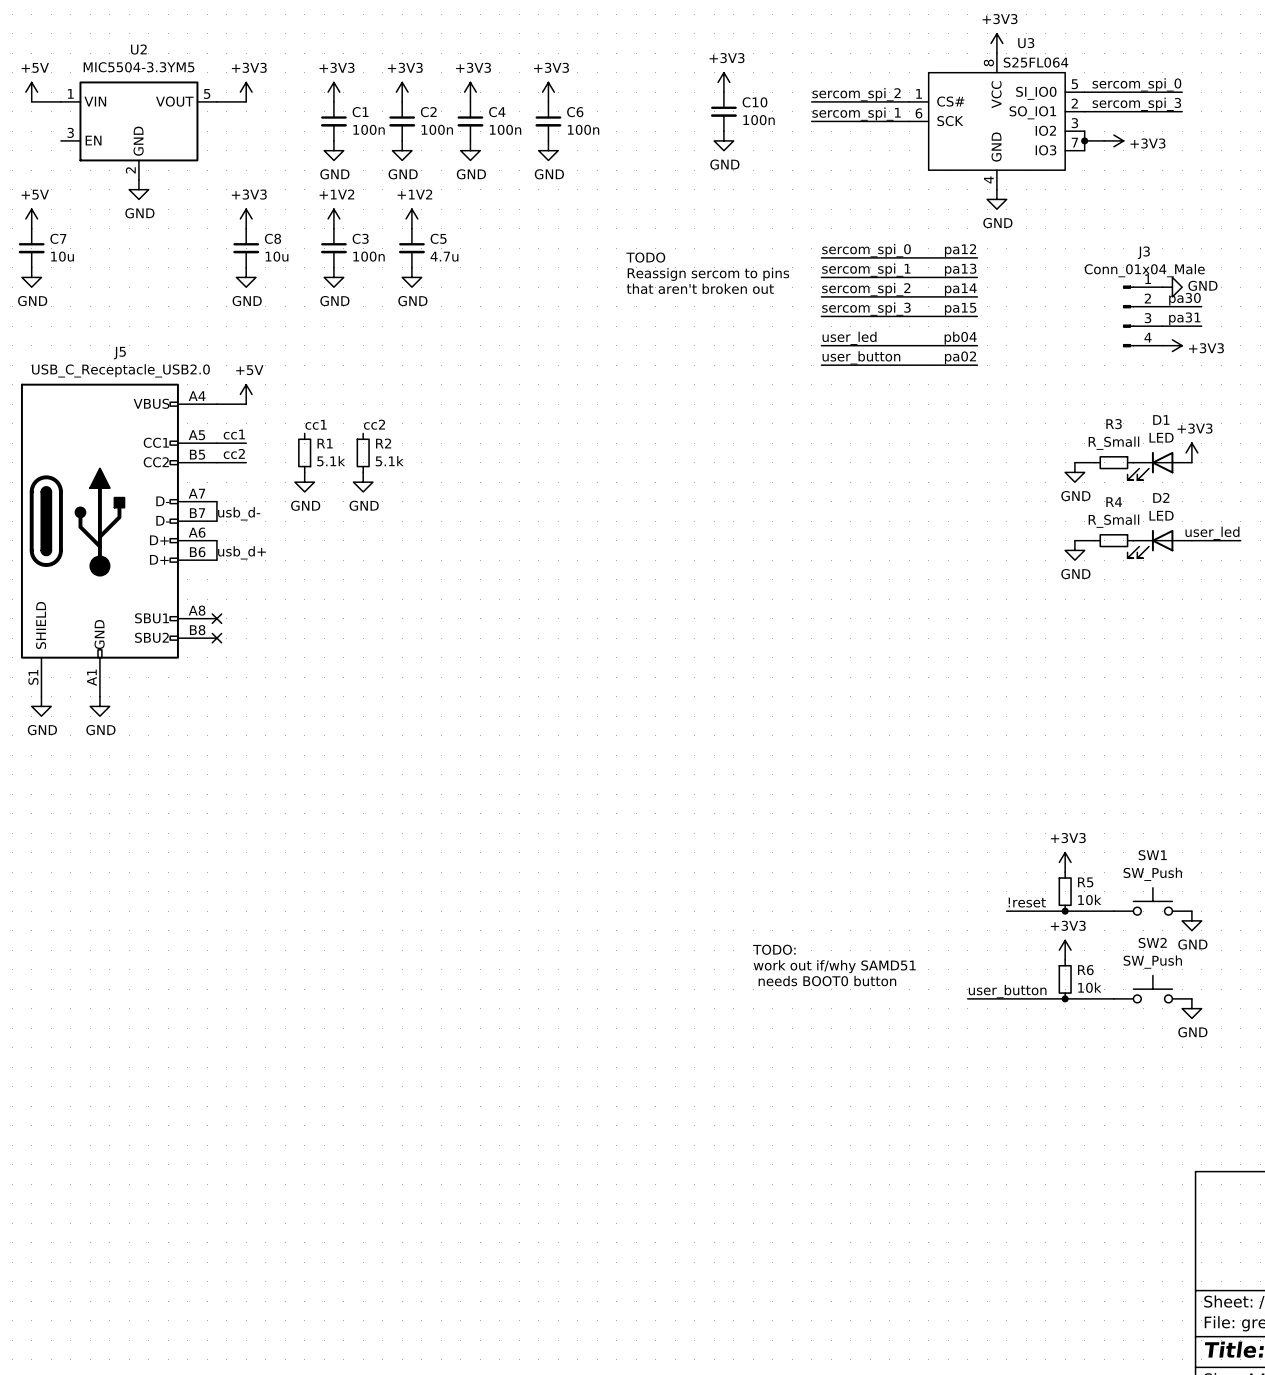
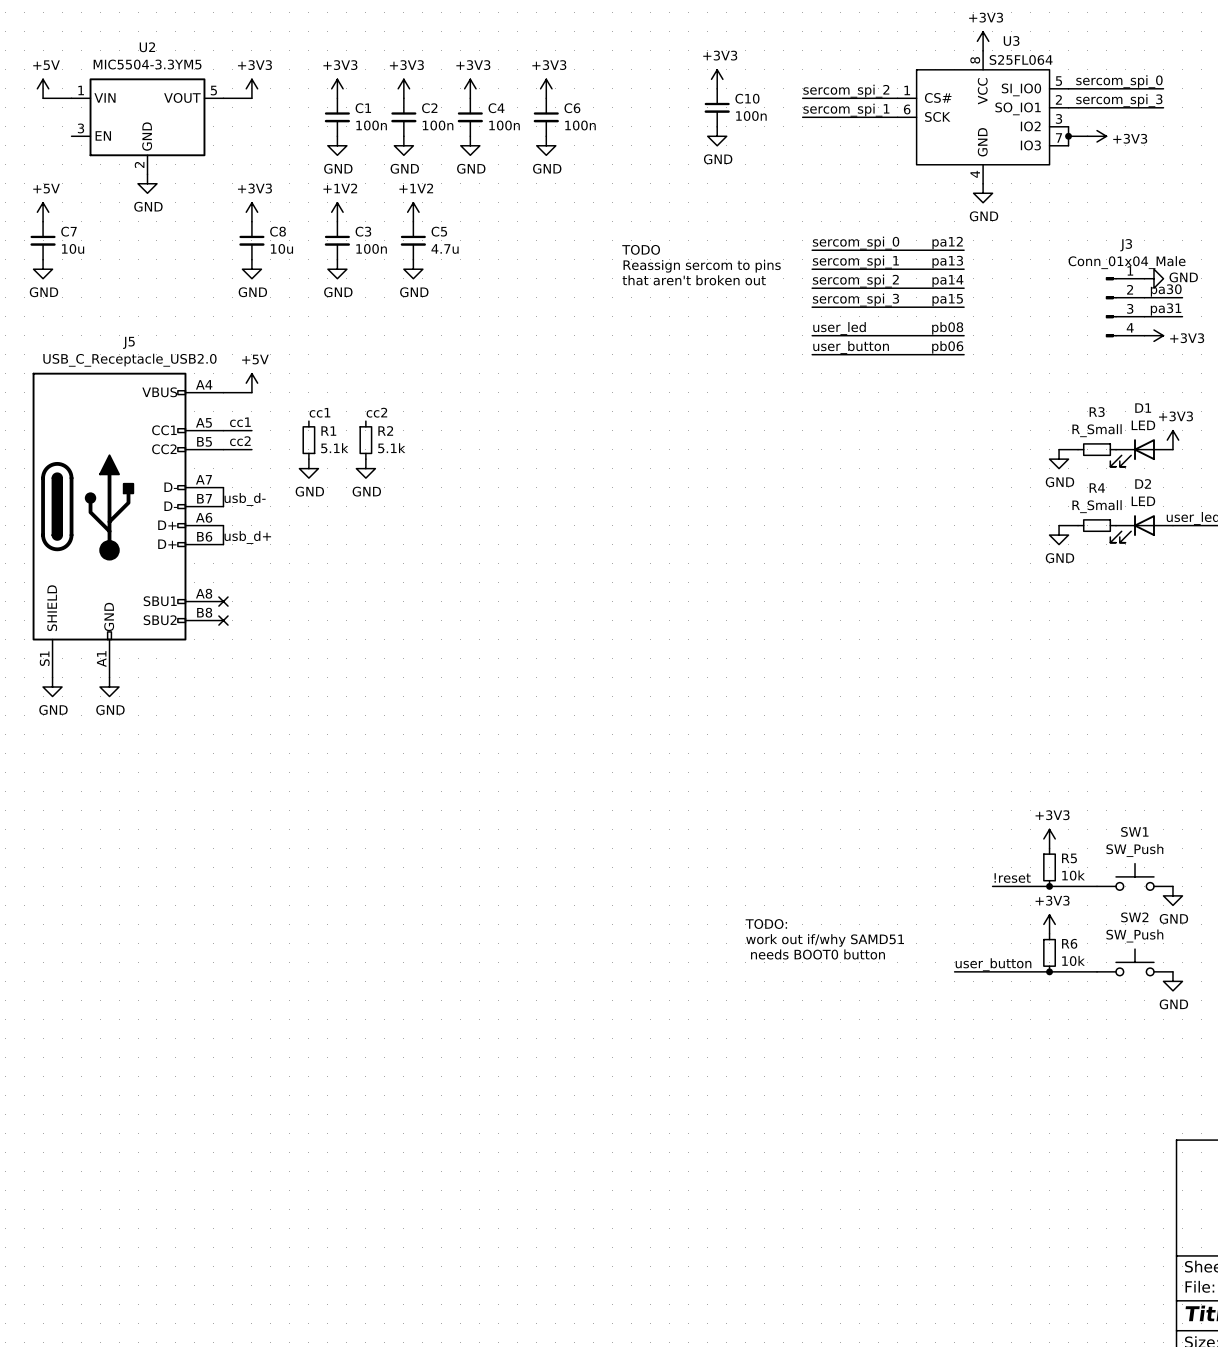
label: pb04 (960, 338) -> pb08 (947, 328)
label: pa02 (960, 357) -> pb06 (947, 347)

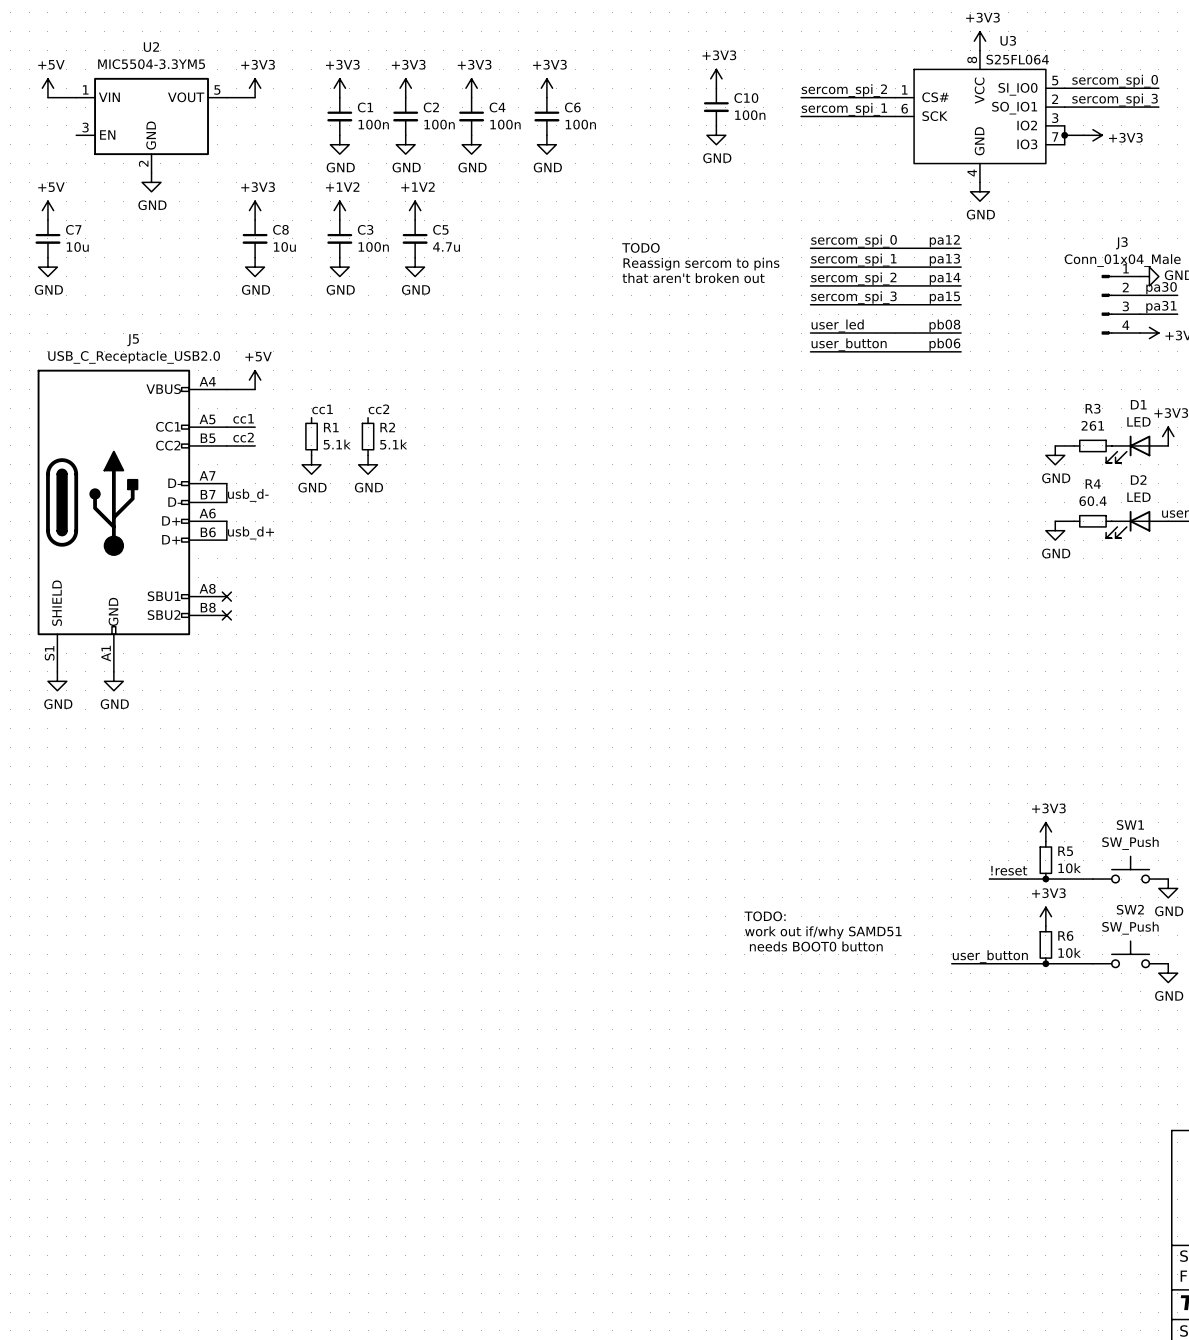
R3 value: R_Small (1097, 430) -> 261 (1092, 425)
R4 value: R_Small (1097, 506) -> 60.4 (1093, 501)

